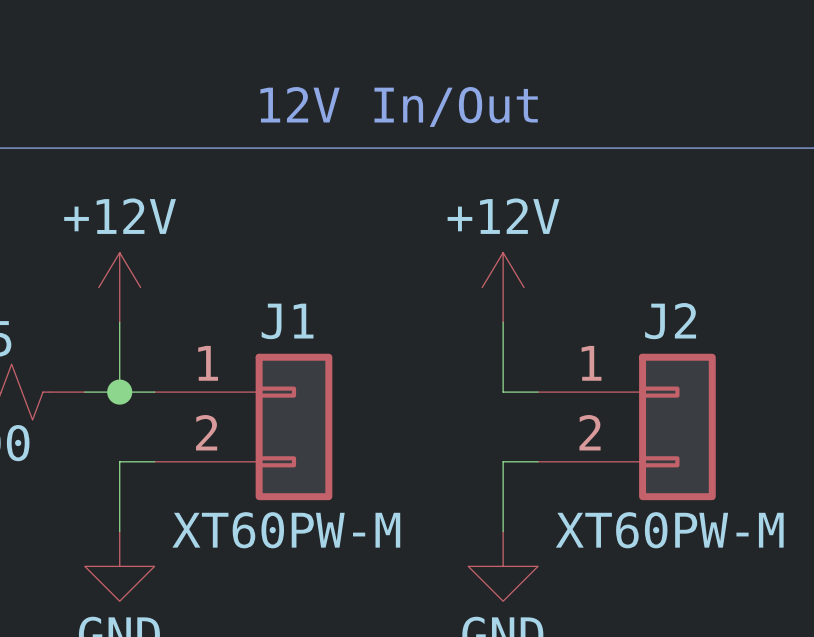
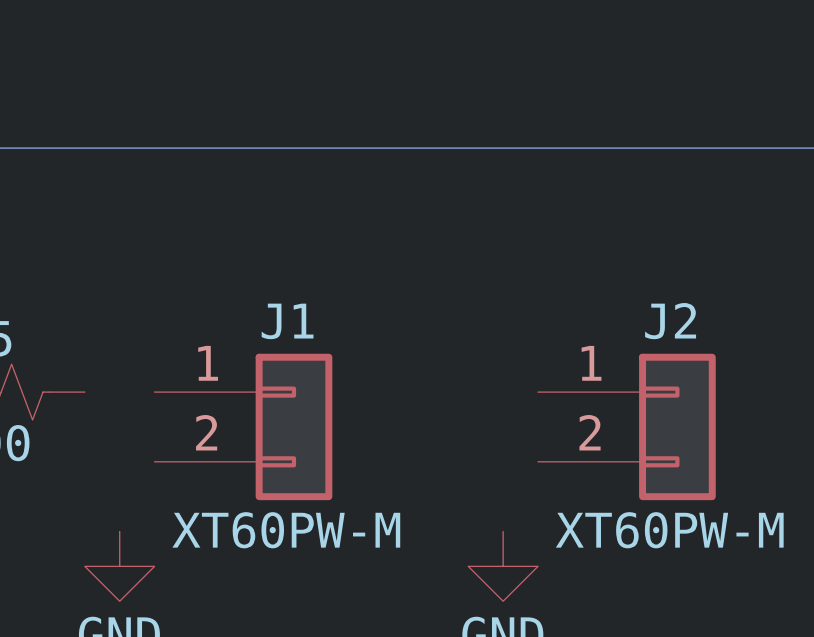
text: 12V In/Out (399, 106) -> none
power symbol: +12V (119, 287) -> none
power symbol: +12V (503, 287) -> none
wire: (119, 322) (119, 392) -> none
wire: (503, 322) (503, 392) (537, 392) -> none
wire: (84, 392) (154, 392) -> none
junction: (119, 392) -> none
wire: (154, 461) (119, 461) (119, 531) -> none
wire: (537, 461) (503, 461) (503, 531) -> none

